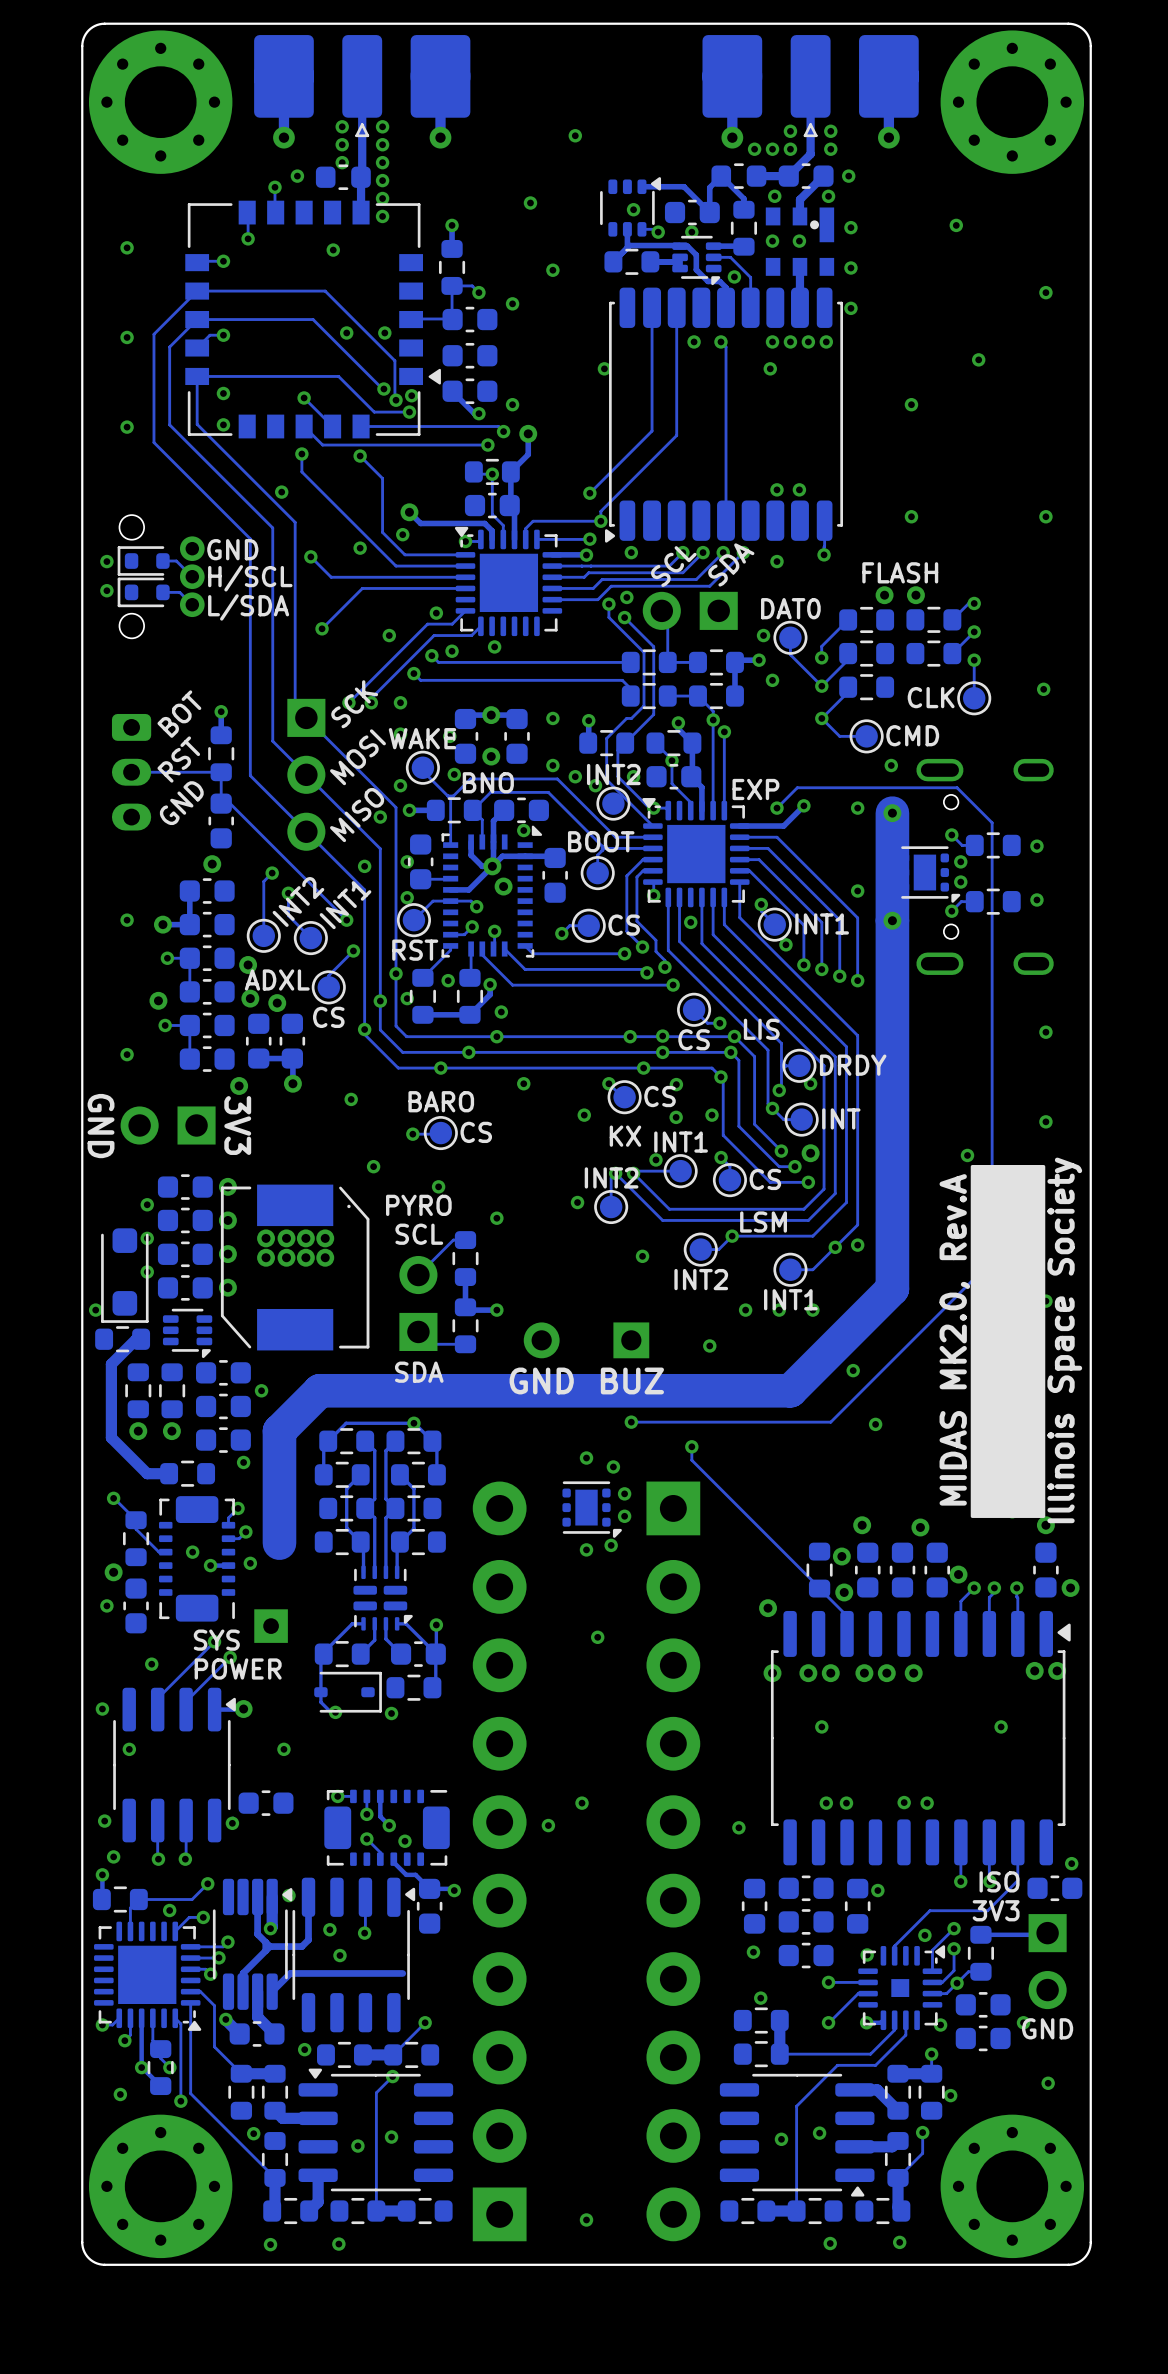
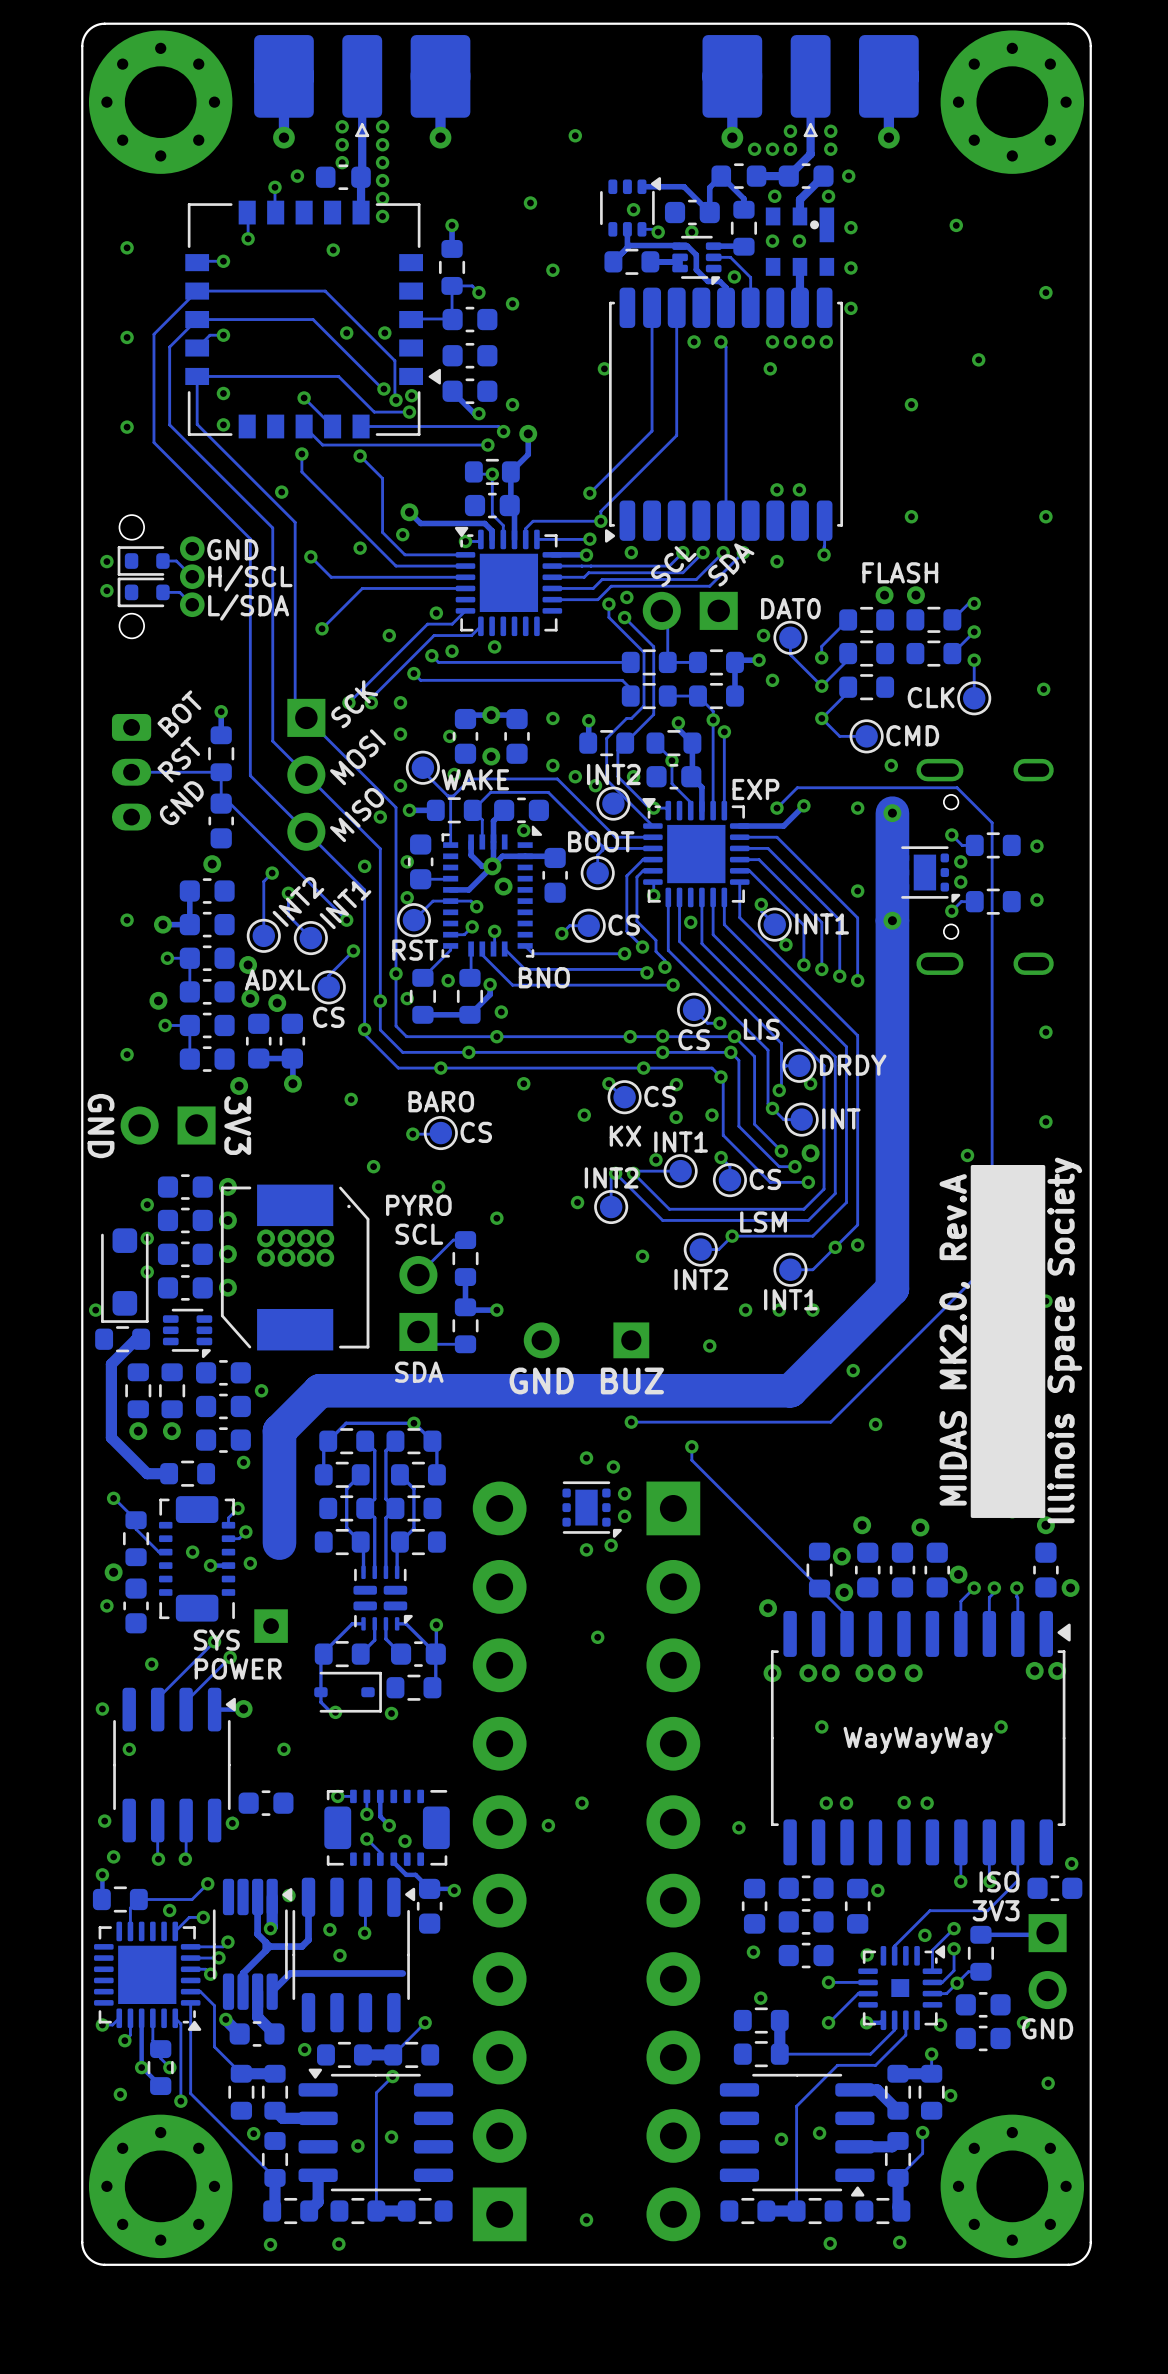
text position: WAKE (422, 738) -> WAKE (475, 779)
text position: BNO (488, 782) -> BNO (544, 977)
text: none -> WayWayWay (918, 1740)

